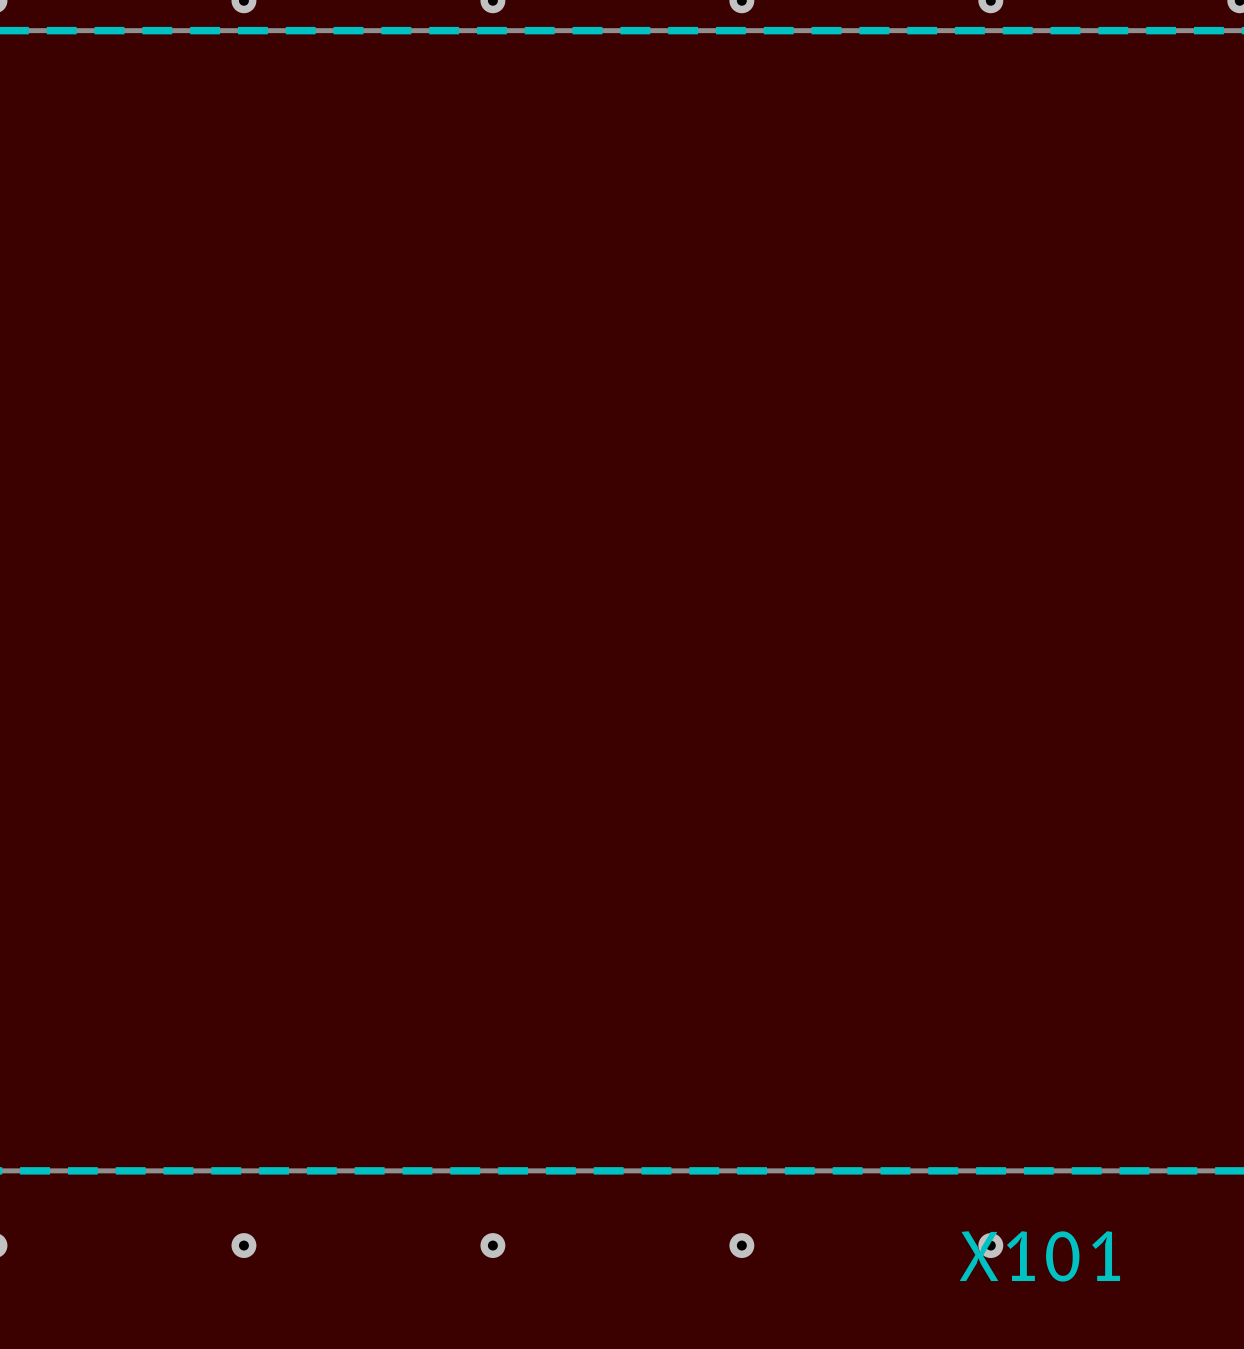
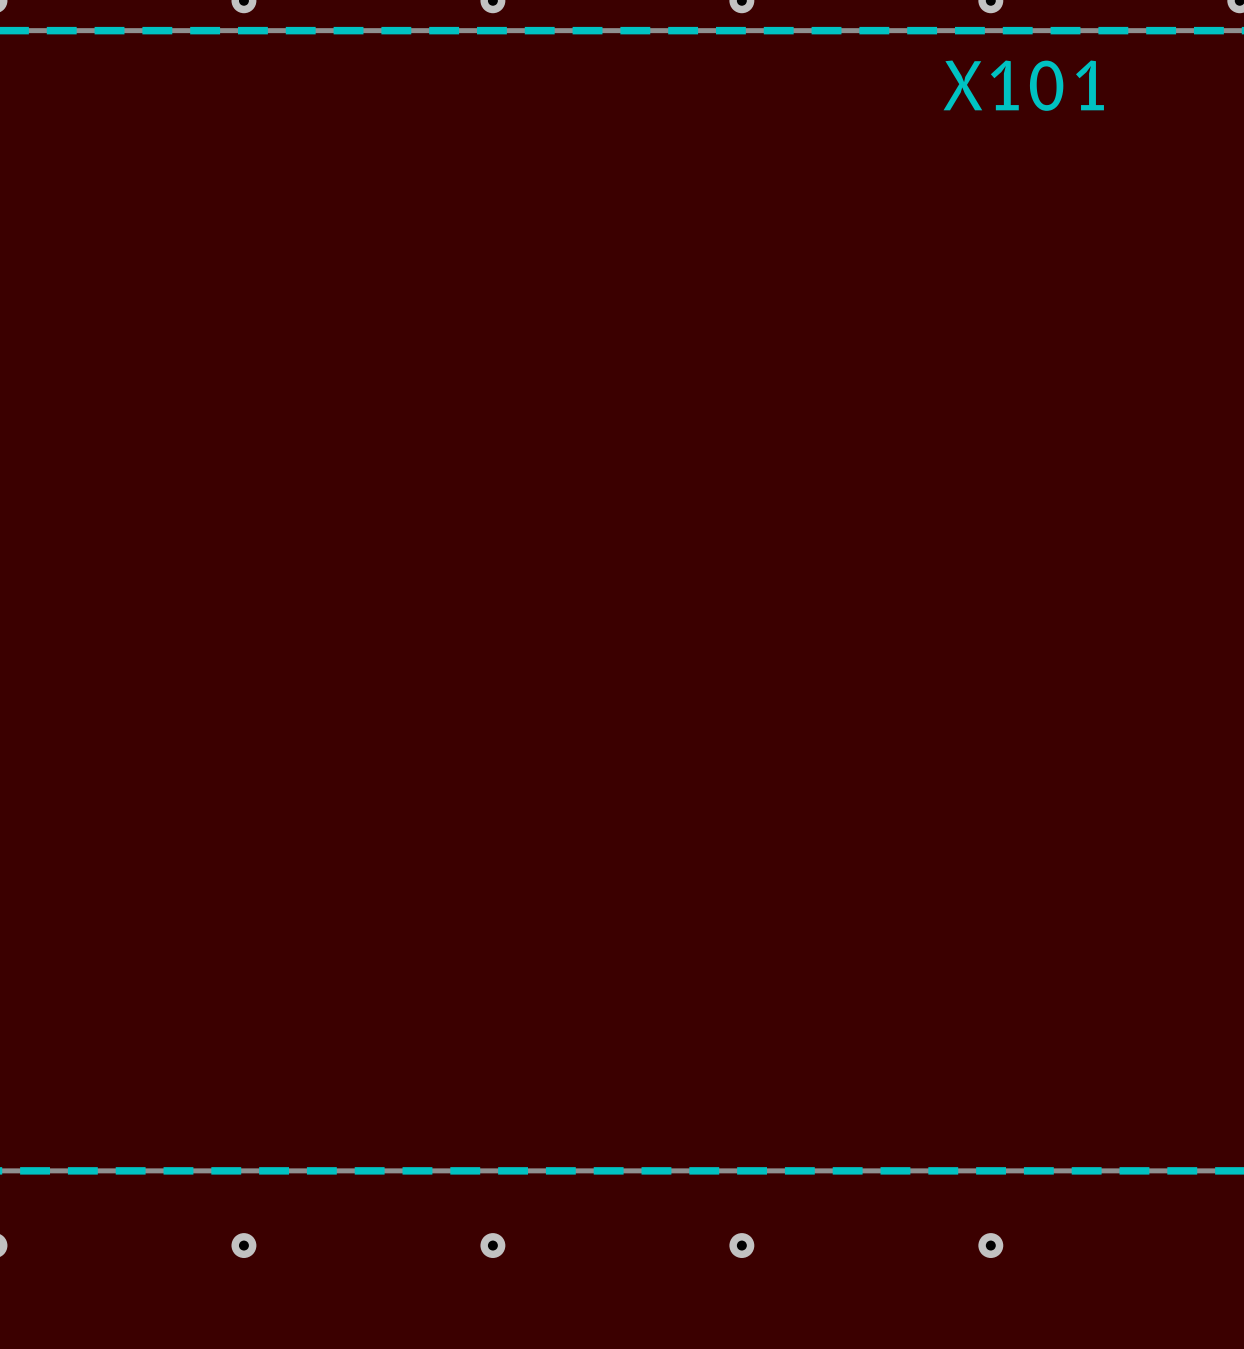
X101 name position: X101 (1039, 1256) -> X101 (1023, 85)

